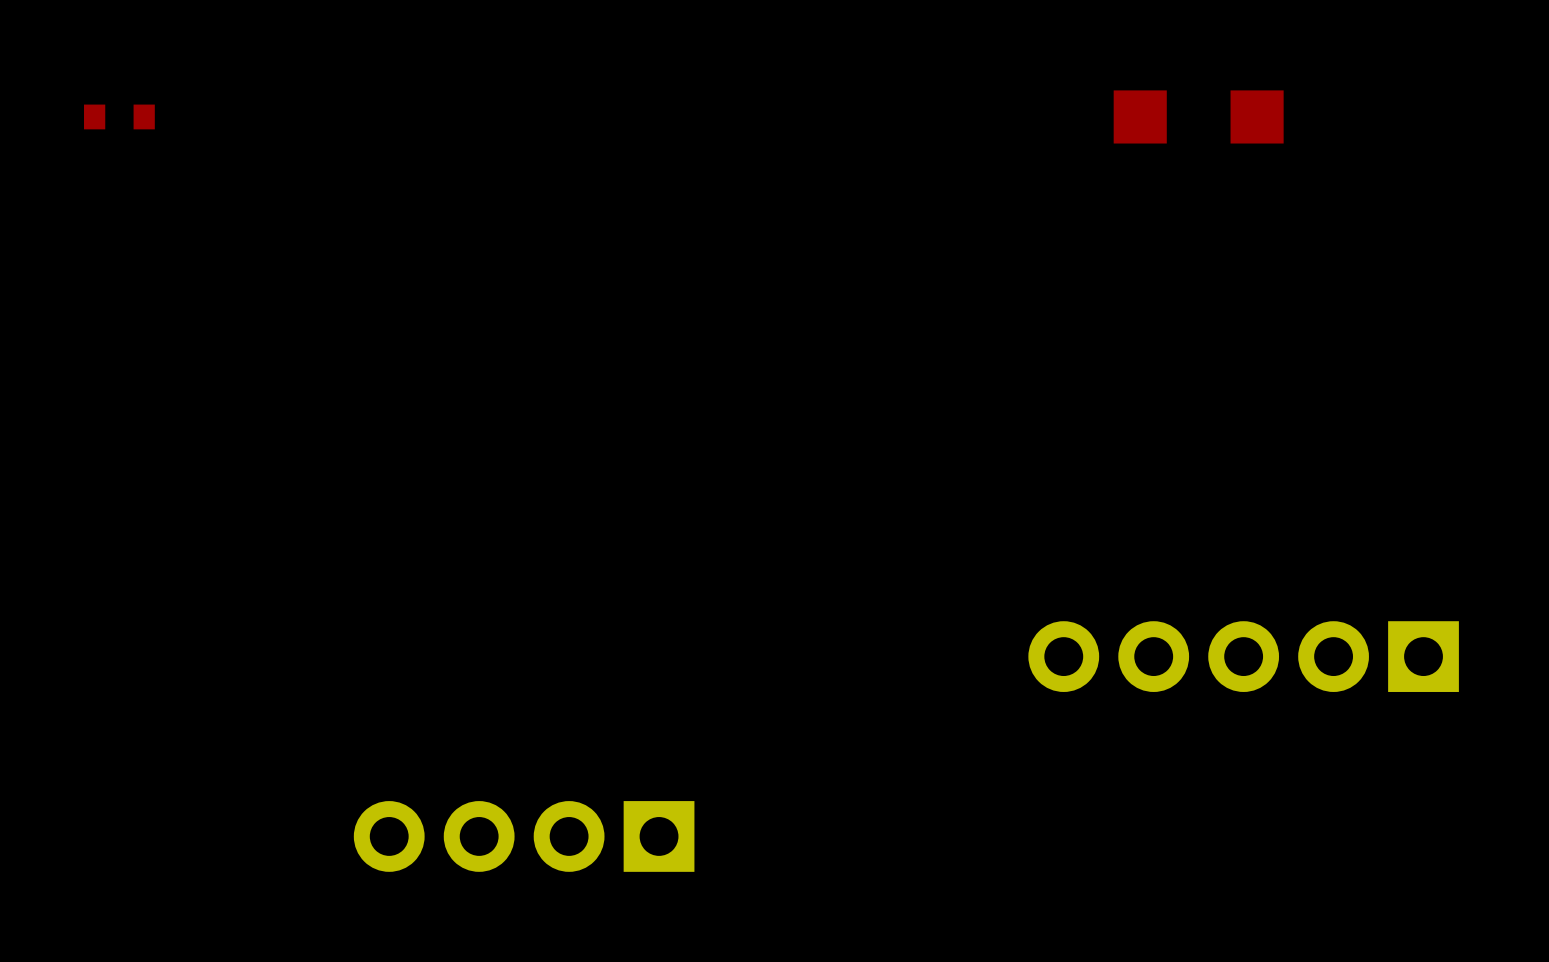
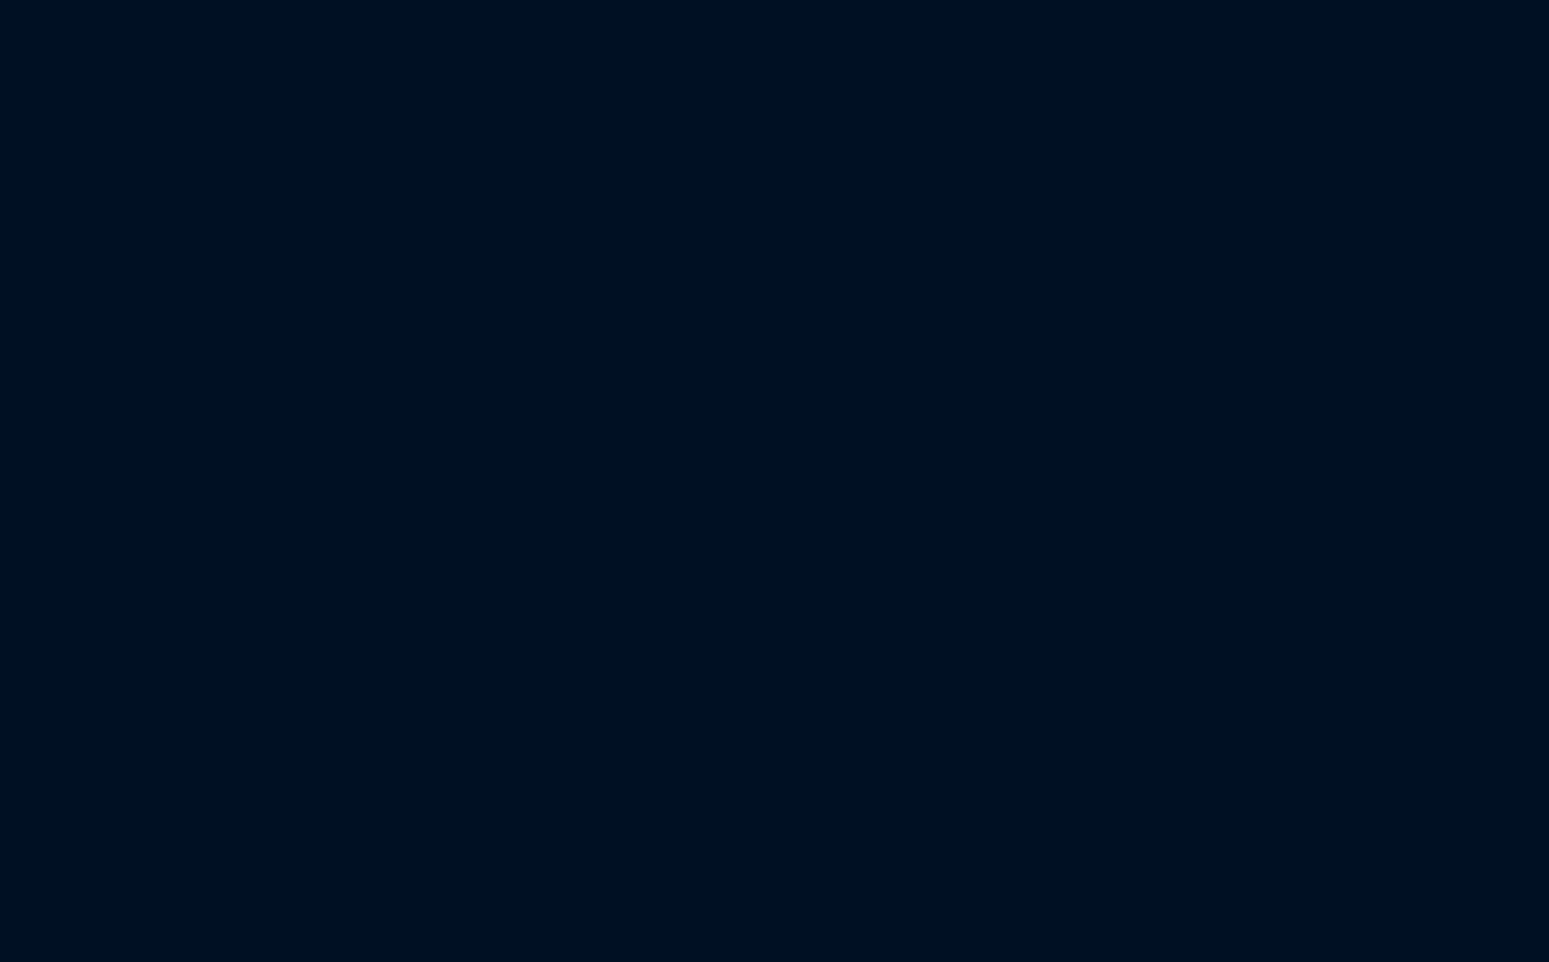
part: (119, 116) -> none
part: (1198, 116) -> none
part: (1243, 656) -> none
part: (524, 836) -> none

